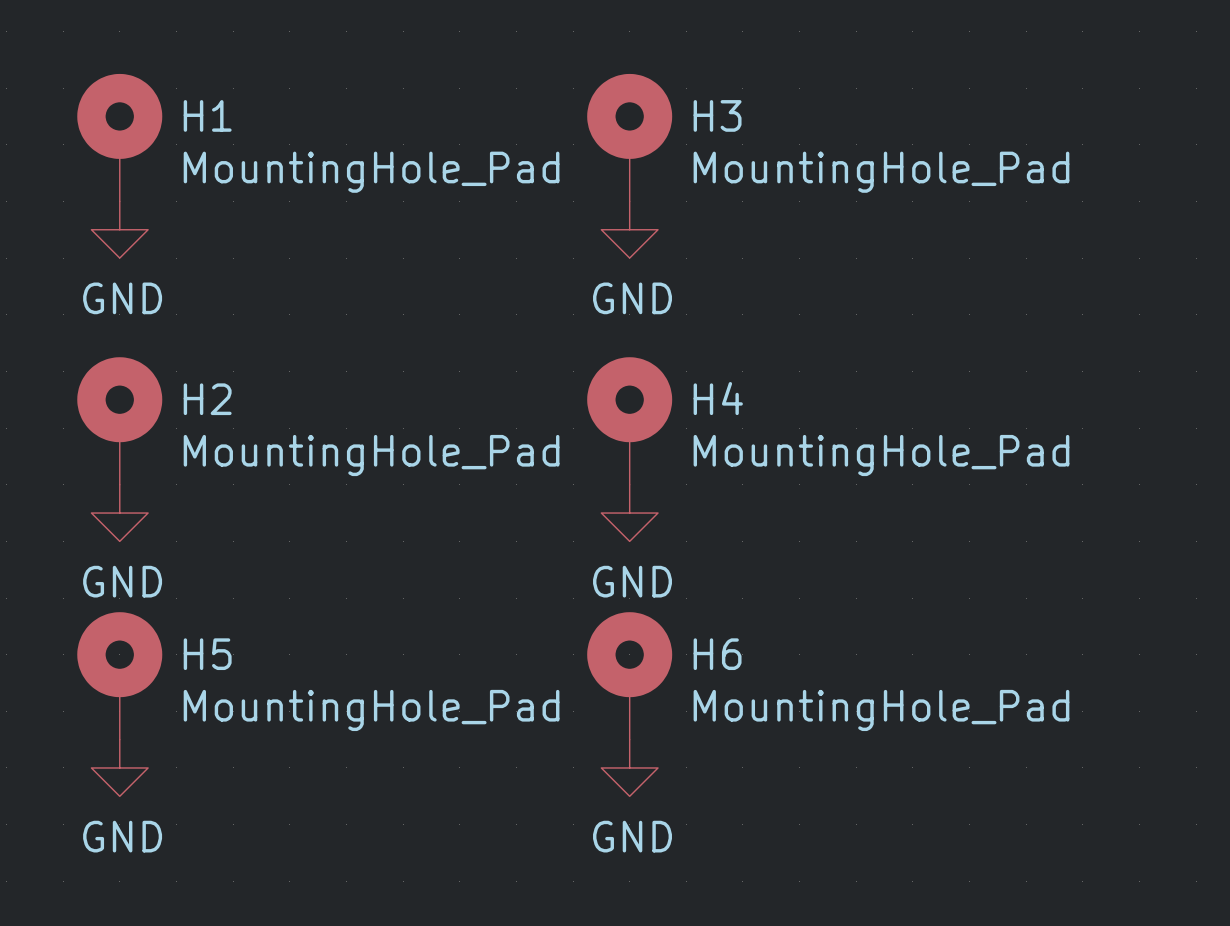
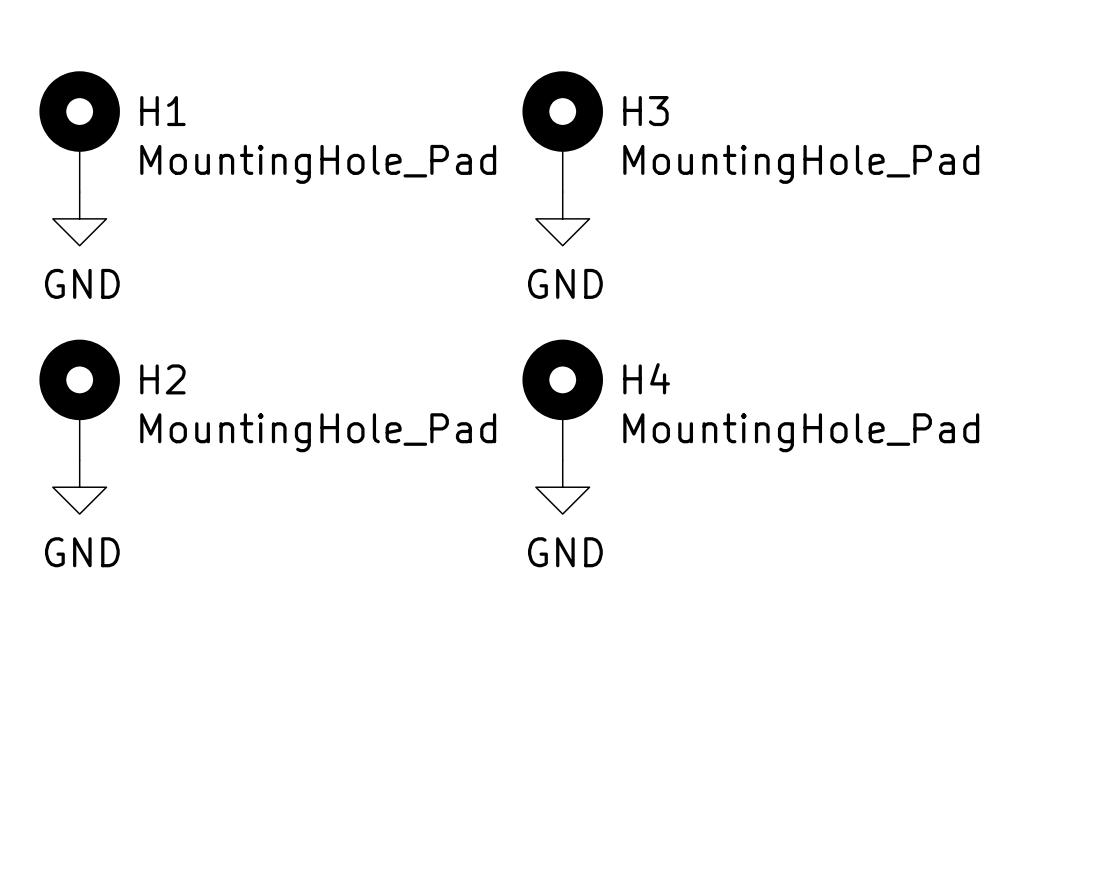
H5: MountingHole_Pad (119, 675) -> none
H6: MountingHole_Pad (629, 675) -> none
power symbol: GND (119, 767) -> none
power symbol: GND (629, 767) -> none

